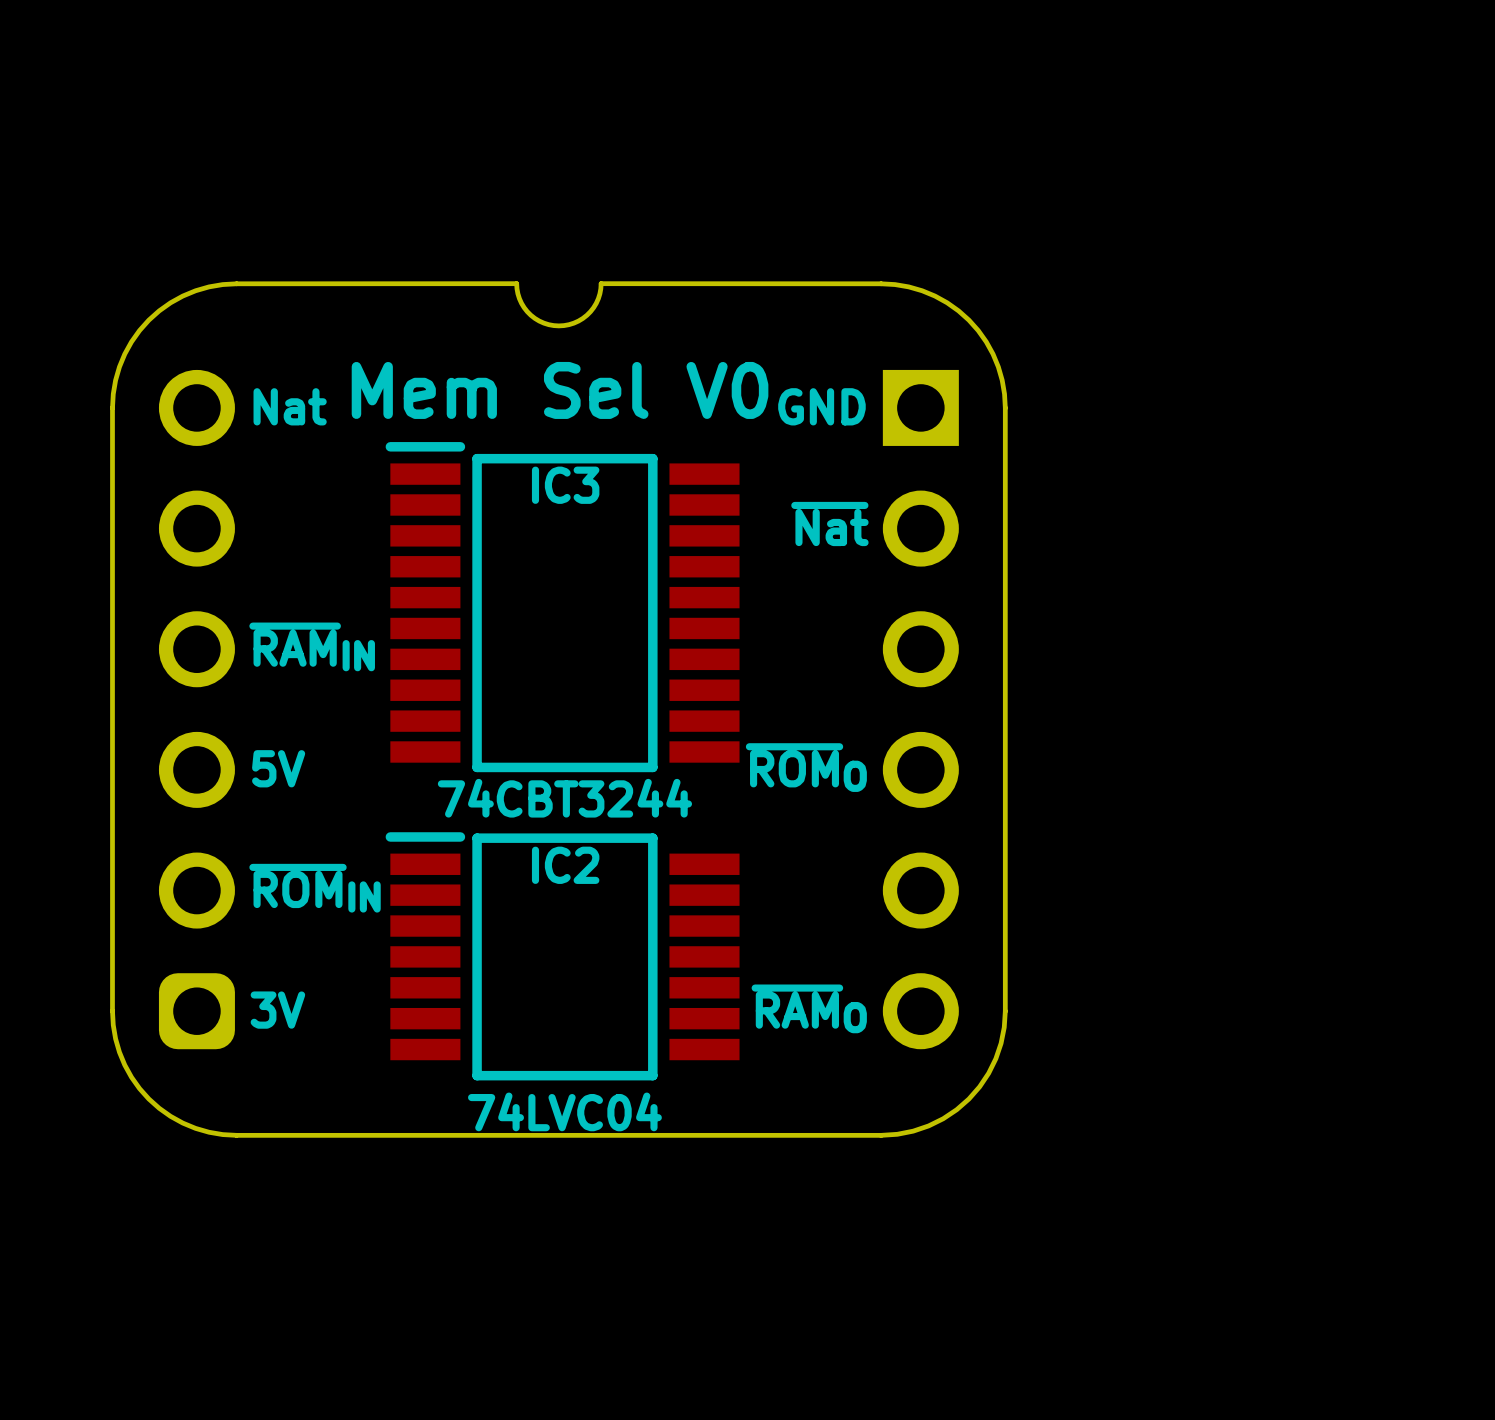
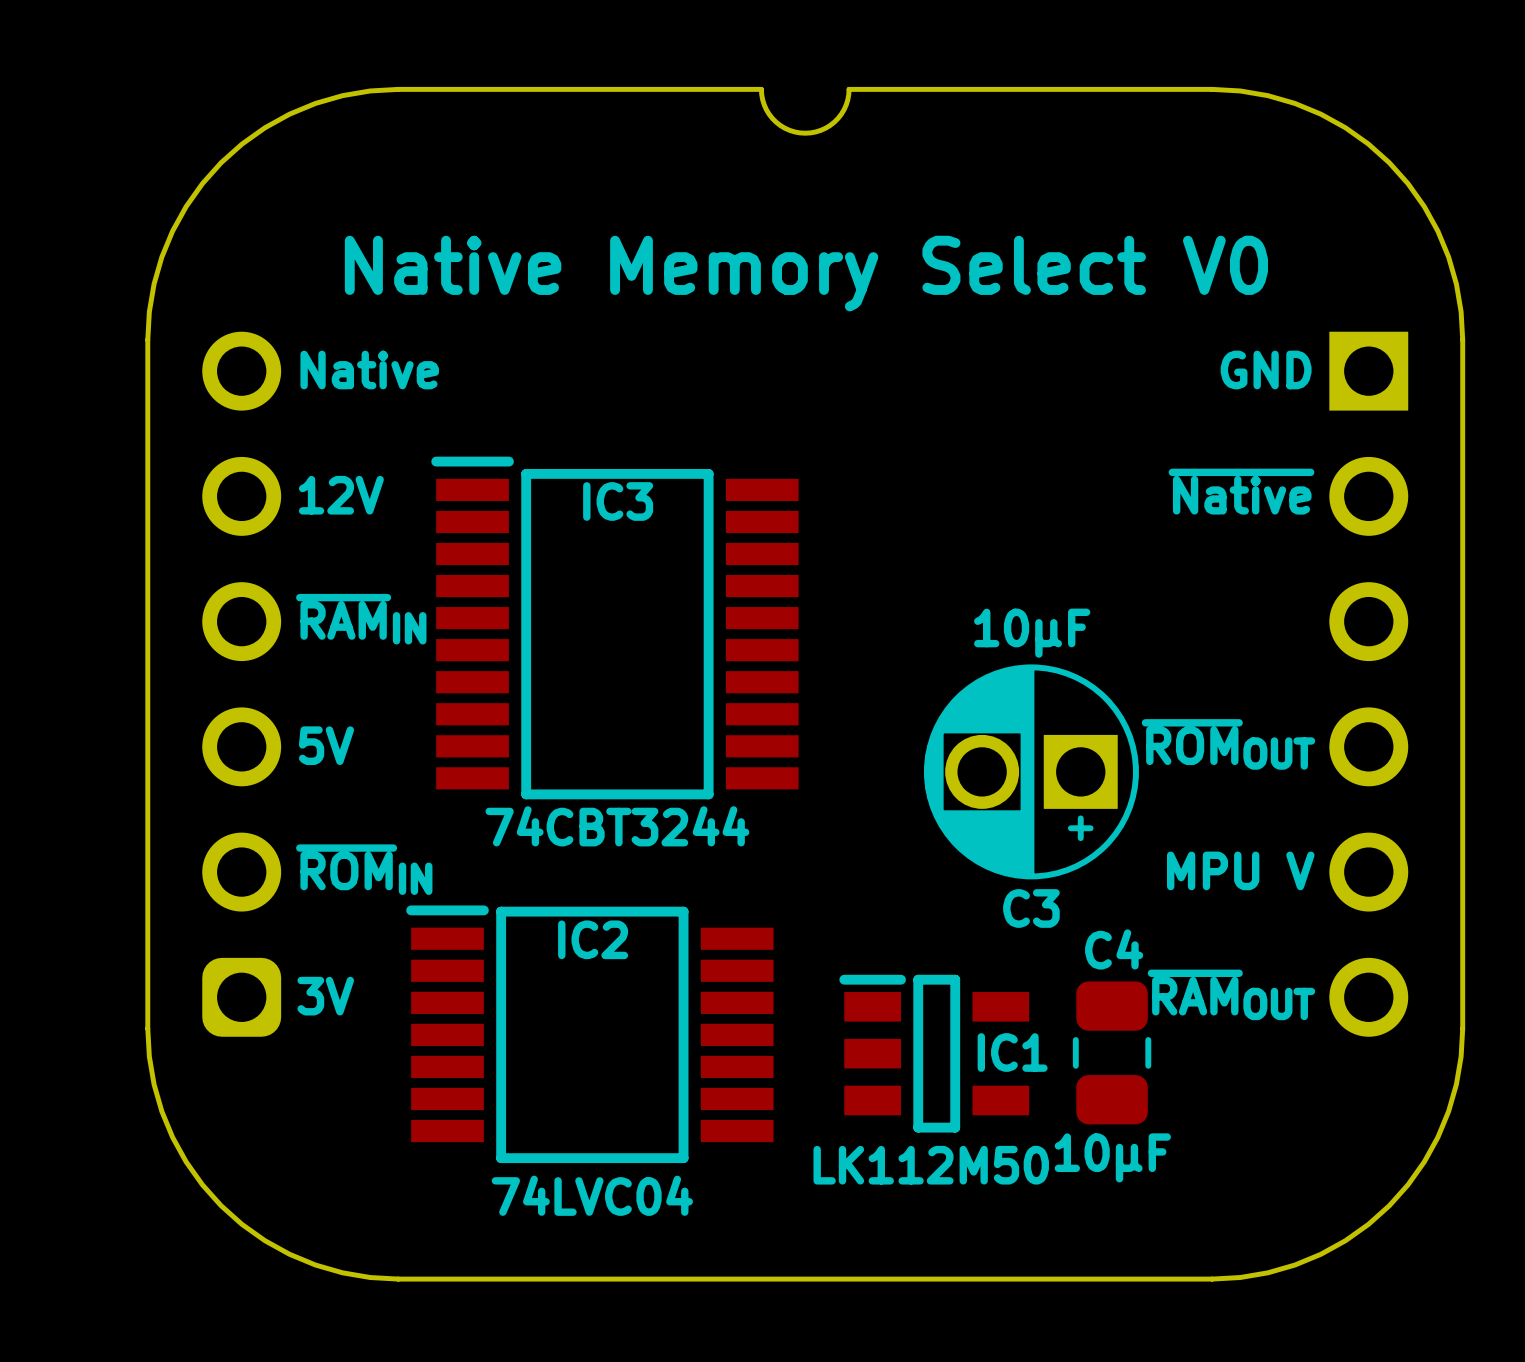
text: Mem Sel V0 (560, 390) -> Native Memory Select V0 (806, 273)
text: Nat (290, 406) -> Native (369, 369)
text position: GND (821, 406) -> GND (1266, 369)
text: ~{Nat} (829, 524) -> none
text: none -> ~{Native} (1241, 491)
text: none -> 12V (341, 495)
IC3 position: (562, 607) -> (614, 627)
part: (558, 709) -> none
part: none -> (805, 684)
text: ~{ROM}O (806, 767) -> ~{ROM}OUT (1228, 744)
C3: none -> 10μF (1031, 771)
text: none -> MPU V (1240, 870)
IC2 position: (562, 956) -> (589, 1034)
text: ~{RAM}O (809, 1008) -> ~{RAM}OUT (1231, 994)
C4: none -> 10µF (1112, 1052)
IC1: none -> (934, 1053)

